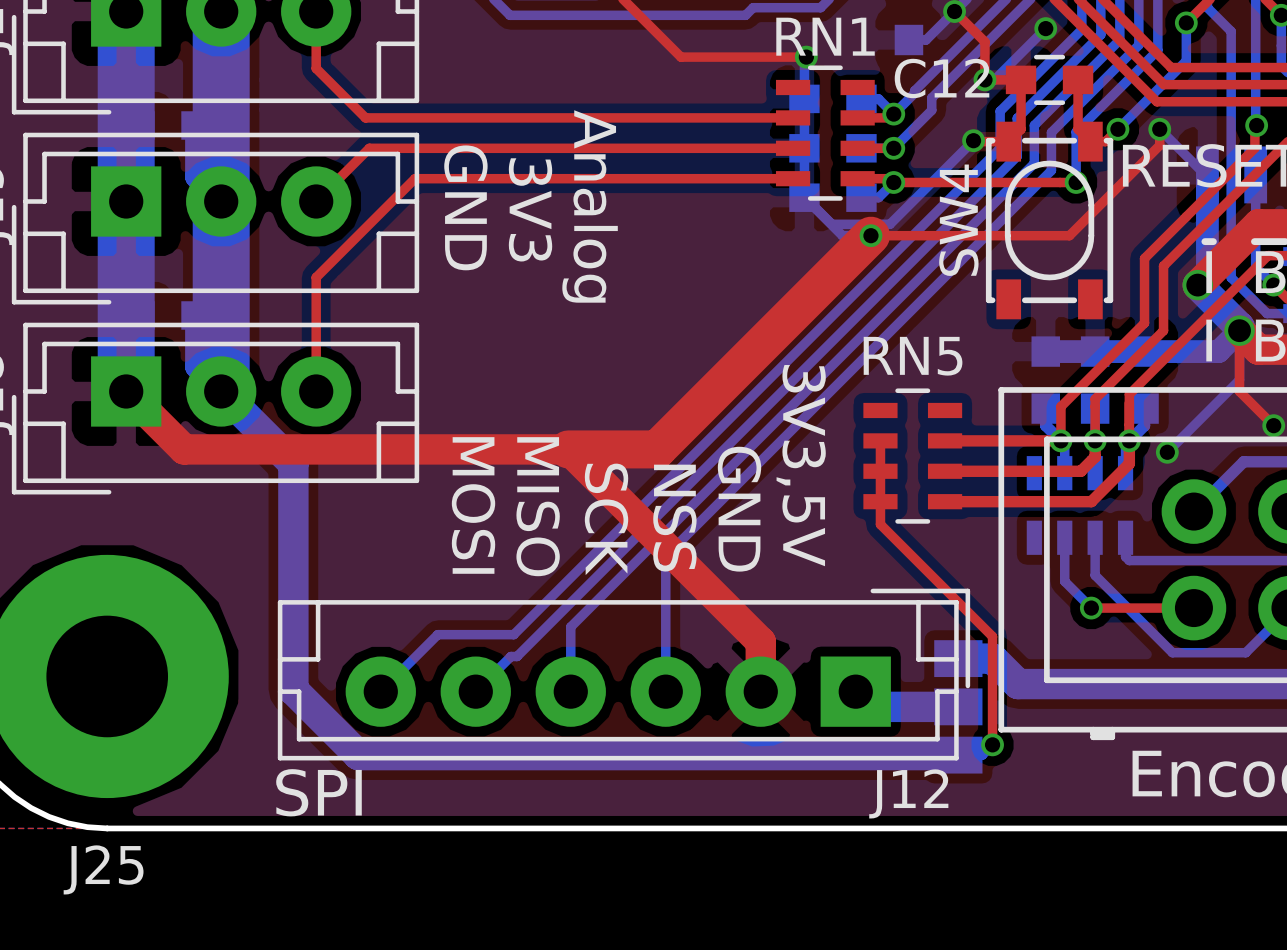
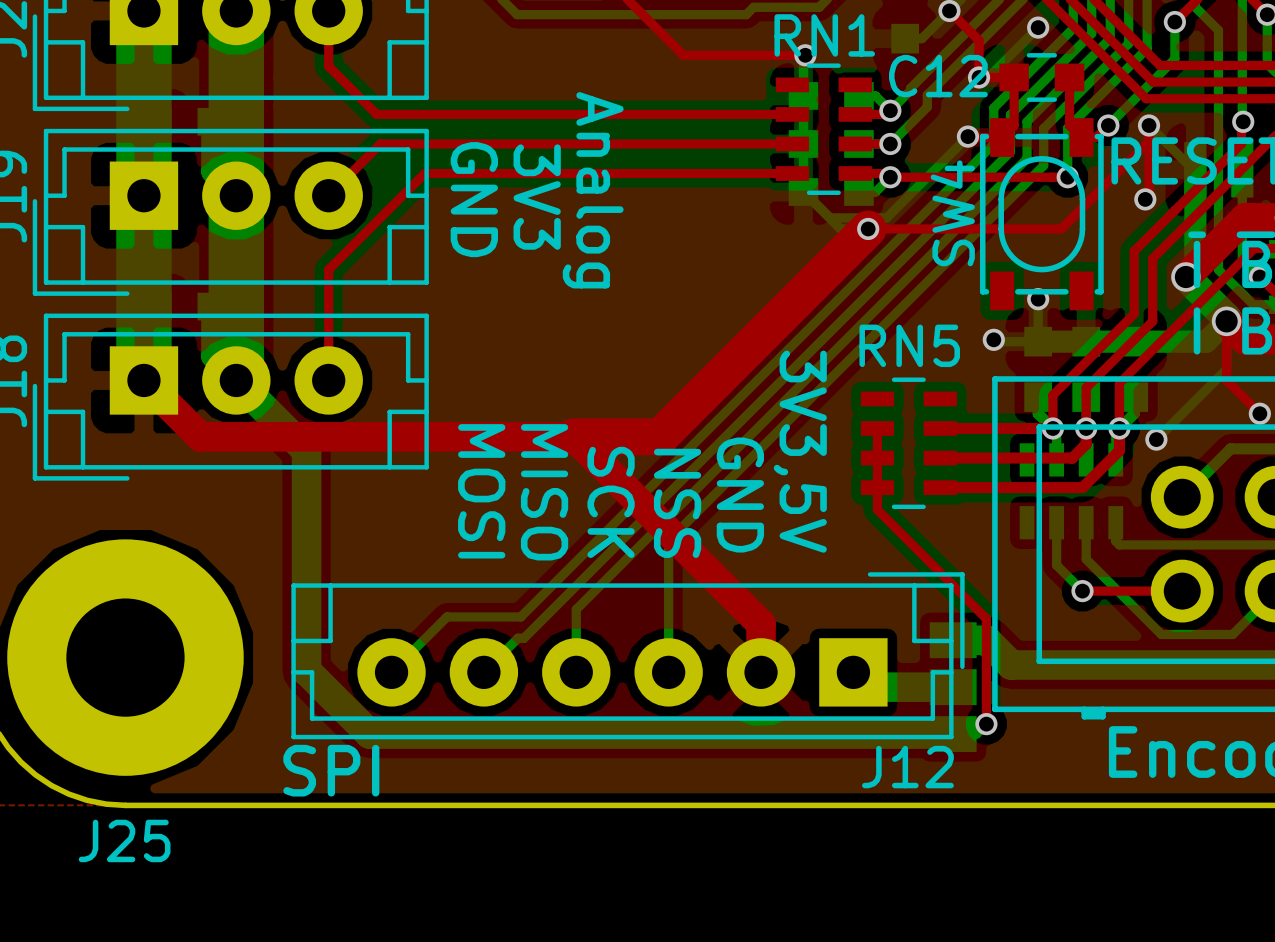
top track: none -> (1149, 141) (1149, 195) (1145, 199)
via: none -> (1145, 199)
via: none -> (1038, 299)
via: none -> (993, 339)

